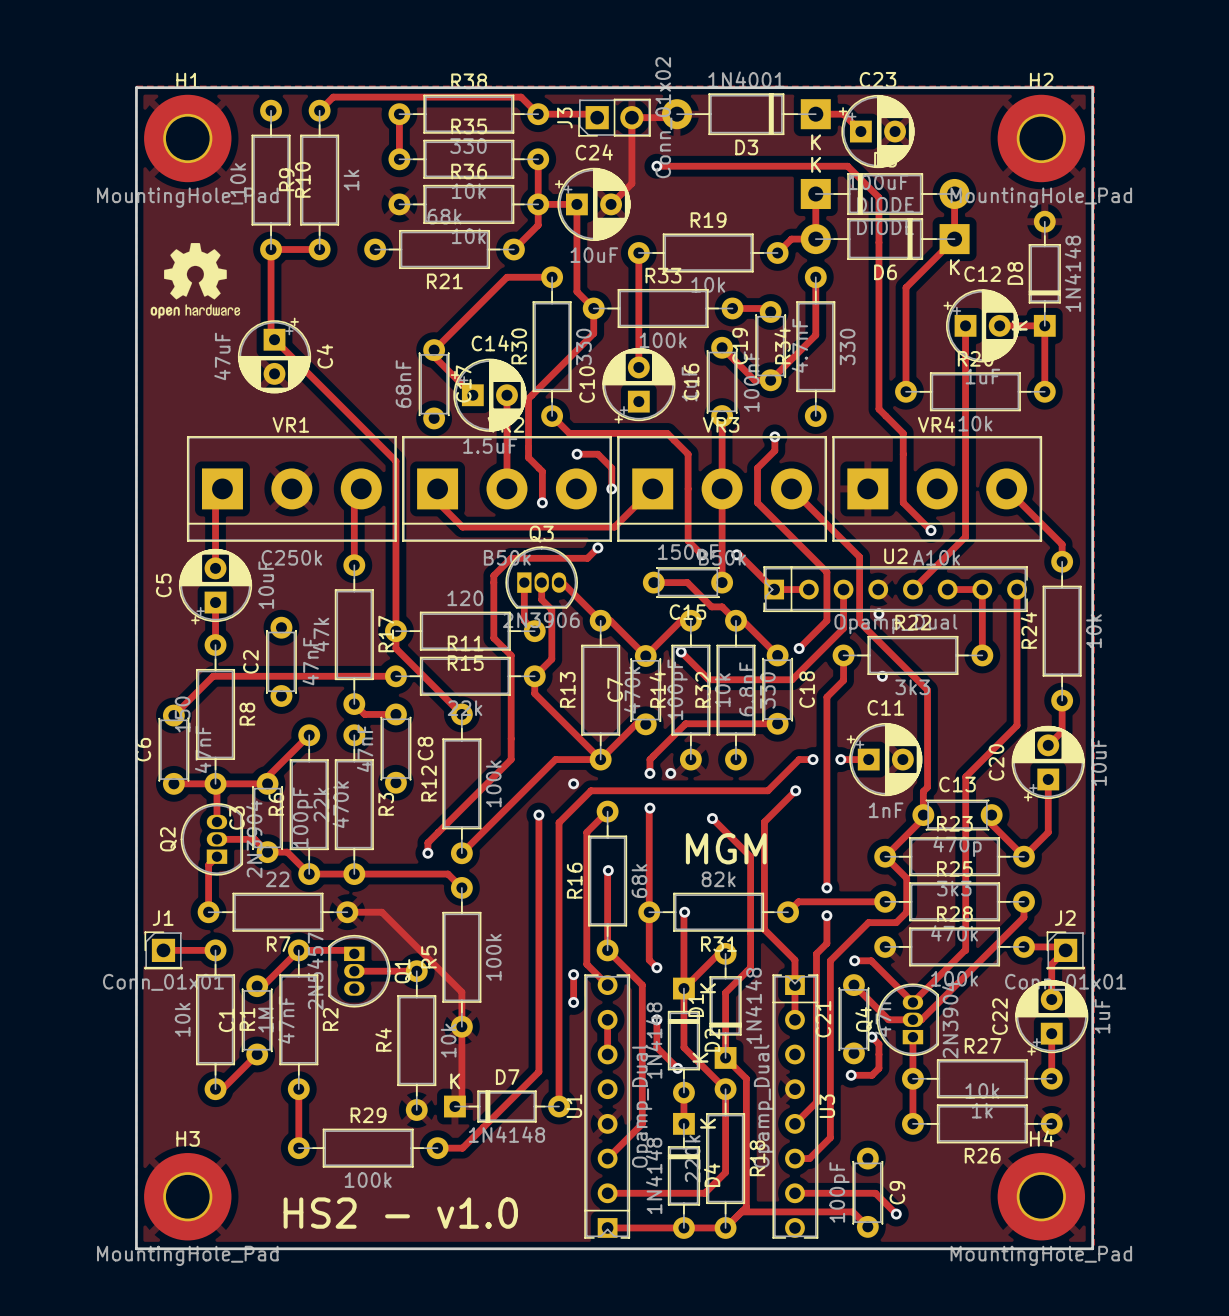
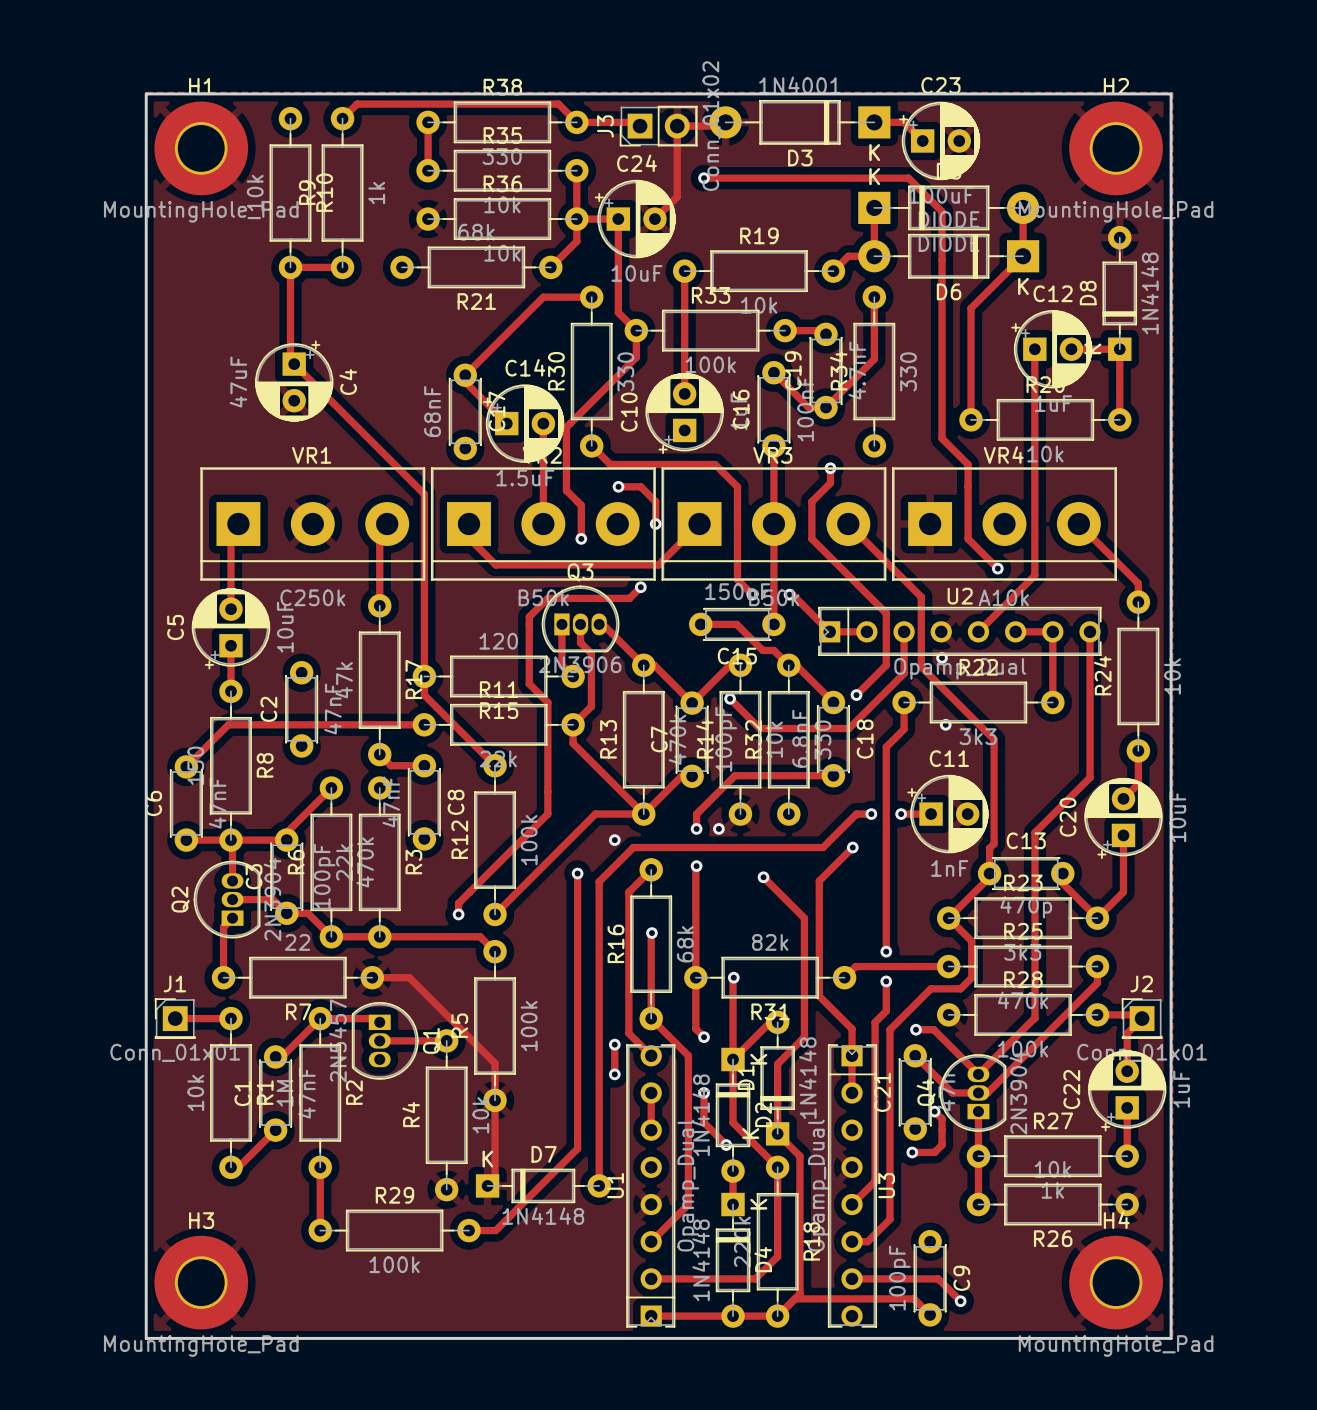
drawing: [150, 242, 241, 319] -> none
text: MGM (726, 848) -> none
text: HS2 - v1.0 (400, 1213) -> none

